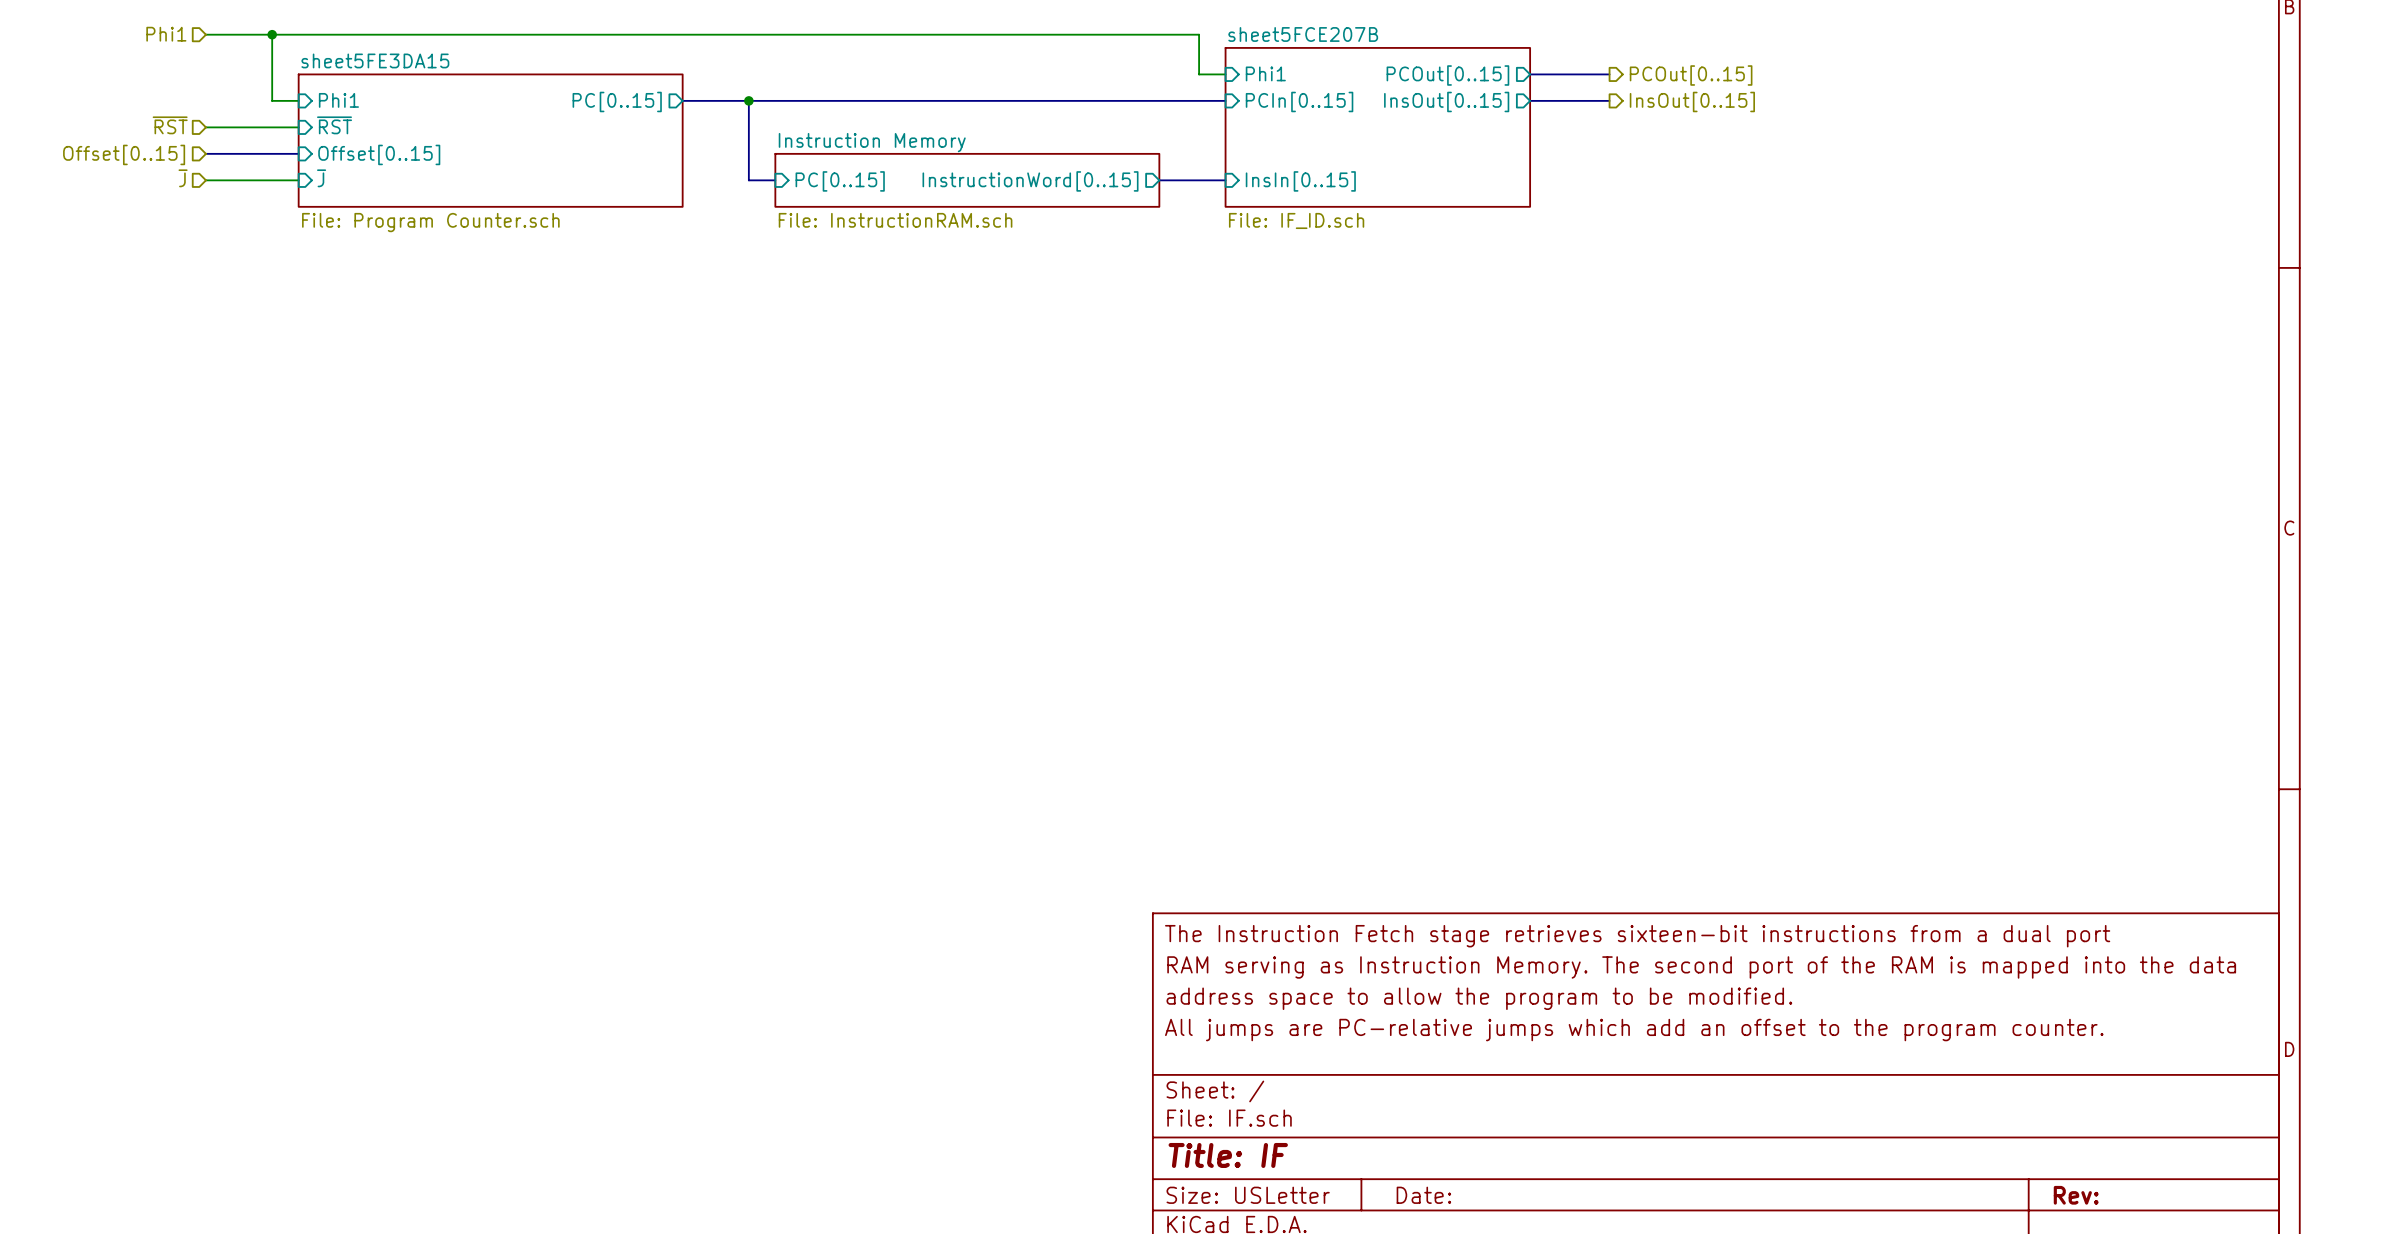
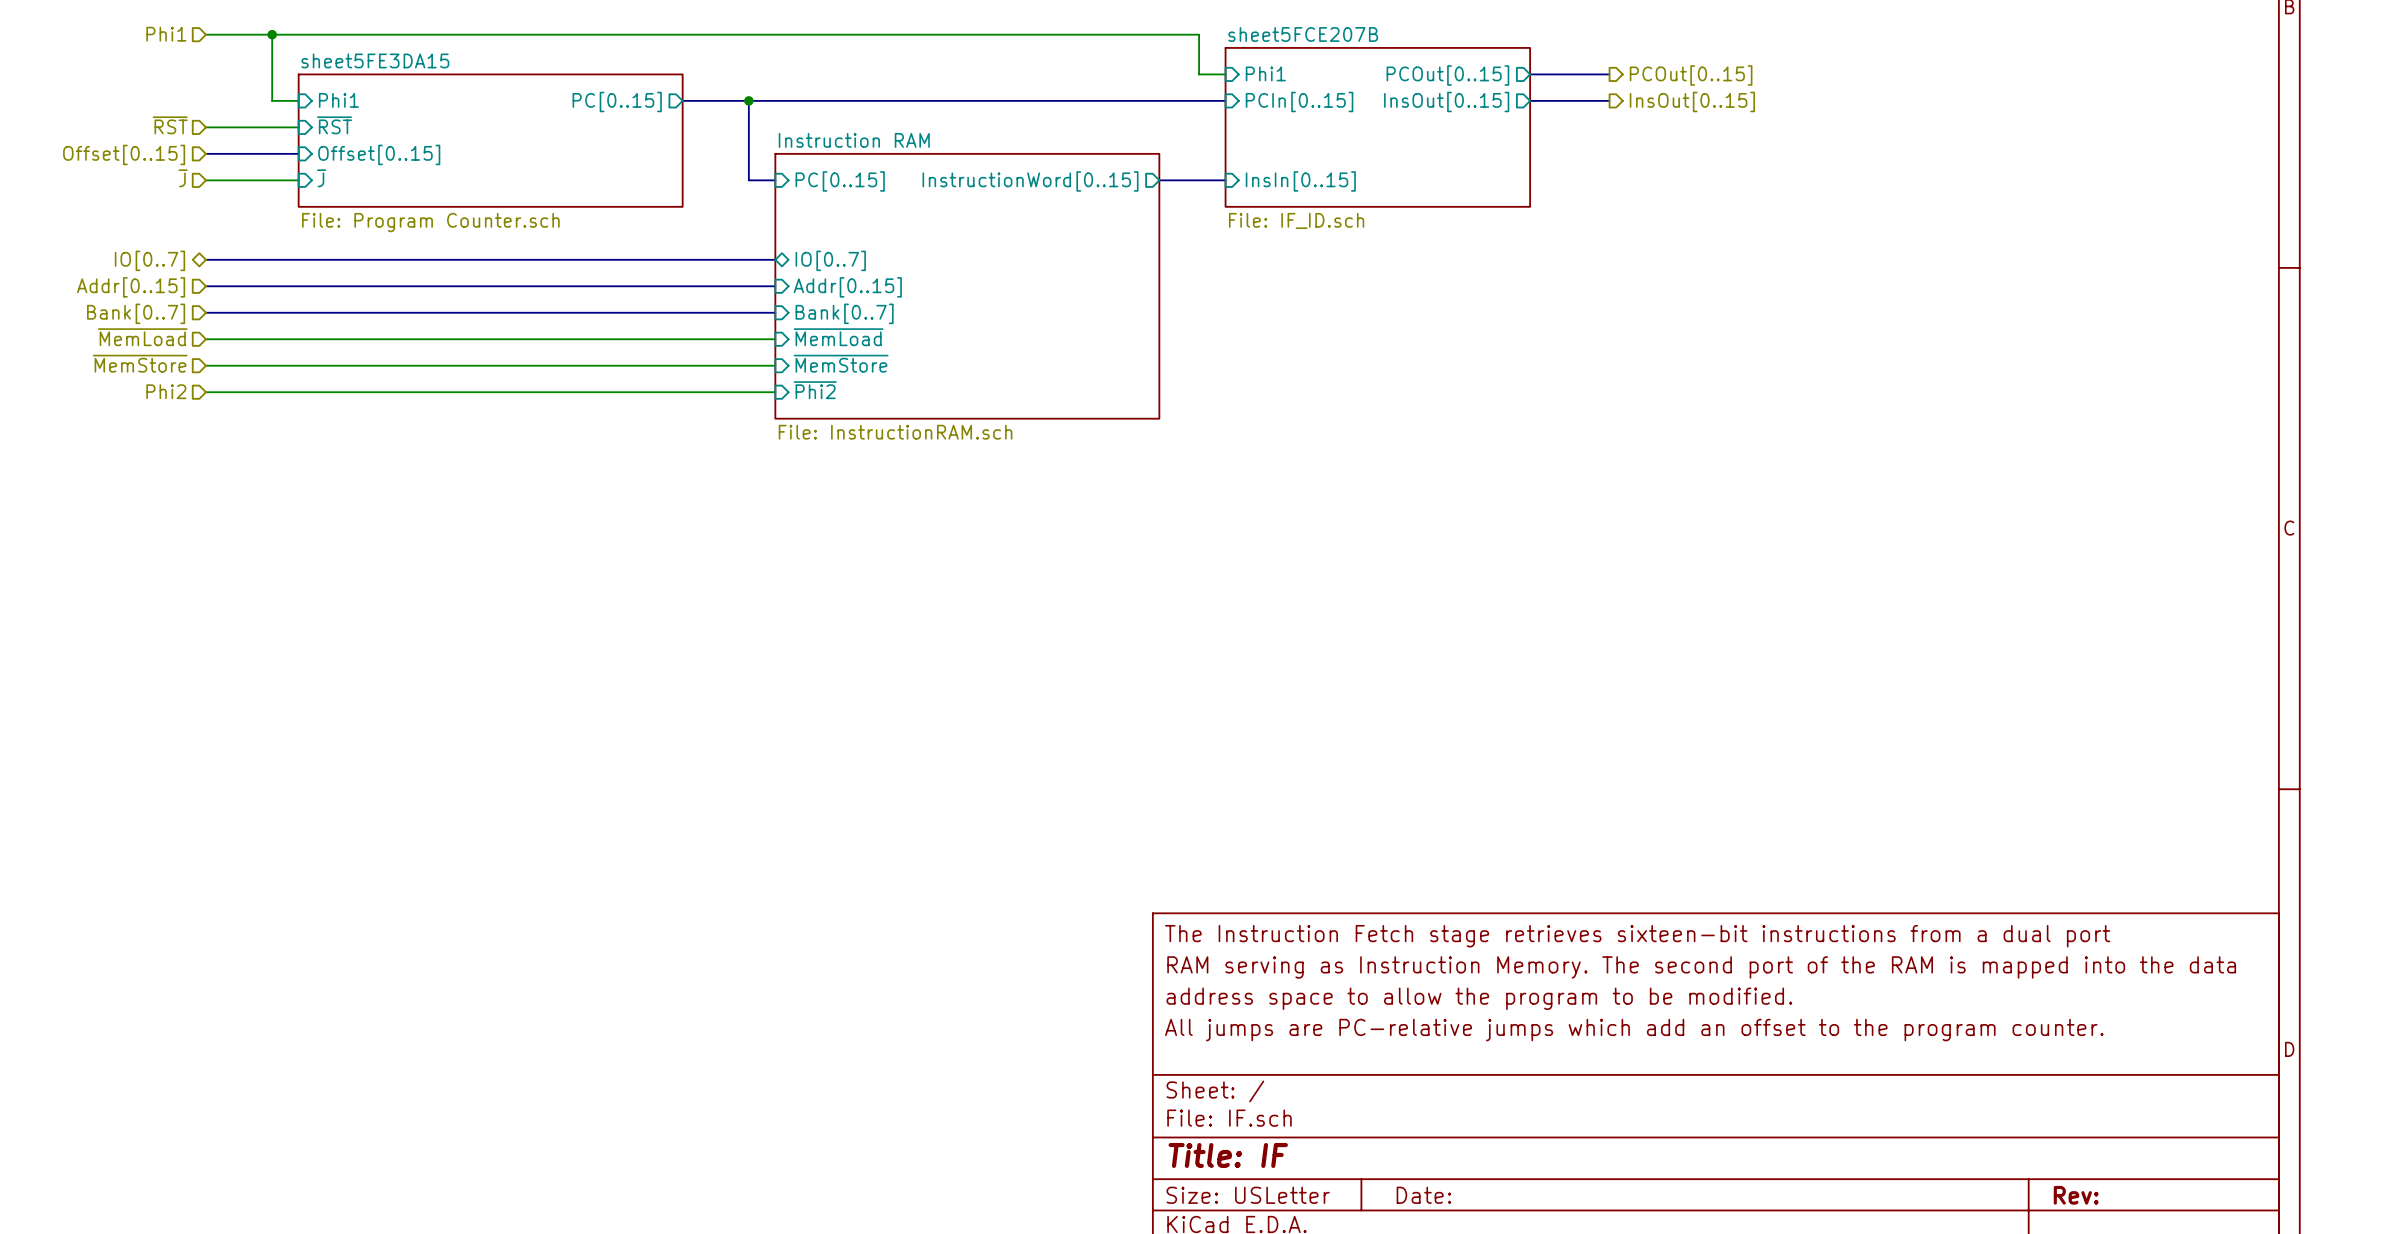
sheet Instruction Memory: File: InstructionRAM.sch (967, 180) -> none
bus: none -> (205, 259) (775, 259)
hierarchical label: none -> IO[0..7] (149, 260)
sheet pin: none -> IO[0..7] (830, 260)
bus: none -> (205, 286) (775, 286)
sheet Instruction RAM: none -> File: InstructionRAM.sch (967, 286)
hierarchical label: none -> Addr[0..15] (131, 287)
sheet pin: none -> Addr[0..15] (847, 287)
bus: none -> (205, 312) (775, 312)
hierarchical label: none -> Bank[0..7] (136, 313)
sheet pin: none -> Bank[0..7] (844, 313)
hierarchical label: none -> ~{MemLoad} (142, 337)
sheet pin: none -> ~{MemLoad} (838, 337)
wire: none -> (205, 339) (775, 339)
hierarchical label: none -> ~{MemStore} (140, 363)
sheet pin: none -> ~{MemStore} (841, 363)
wire: none -> (205, 365) (775, 365)
sheet pin: none -> ~{Phi2} (815, 390)
hierarchical label: none -> Phi2 (166, 391)
wire: none -> (205, 392) (775, 392)

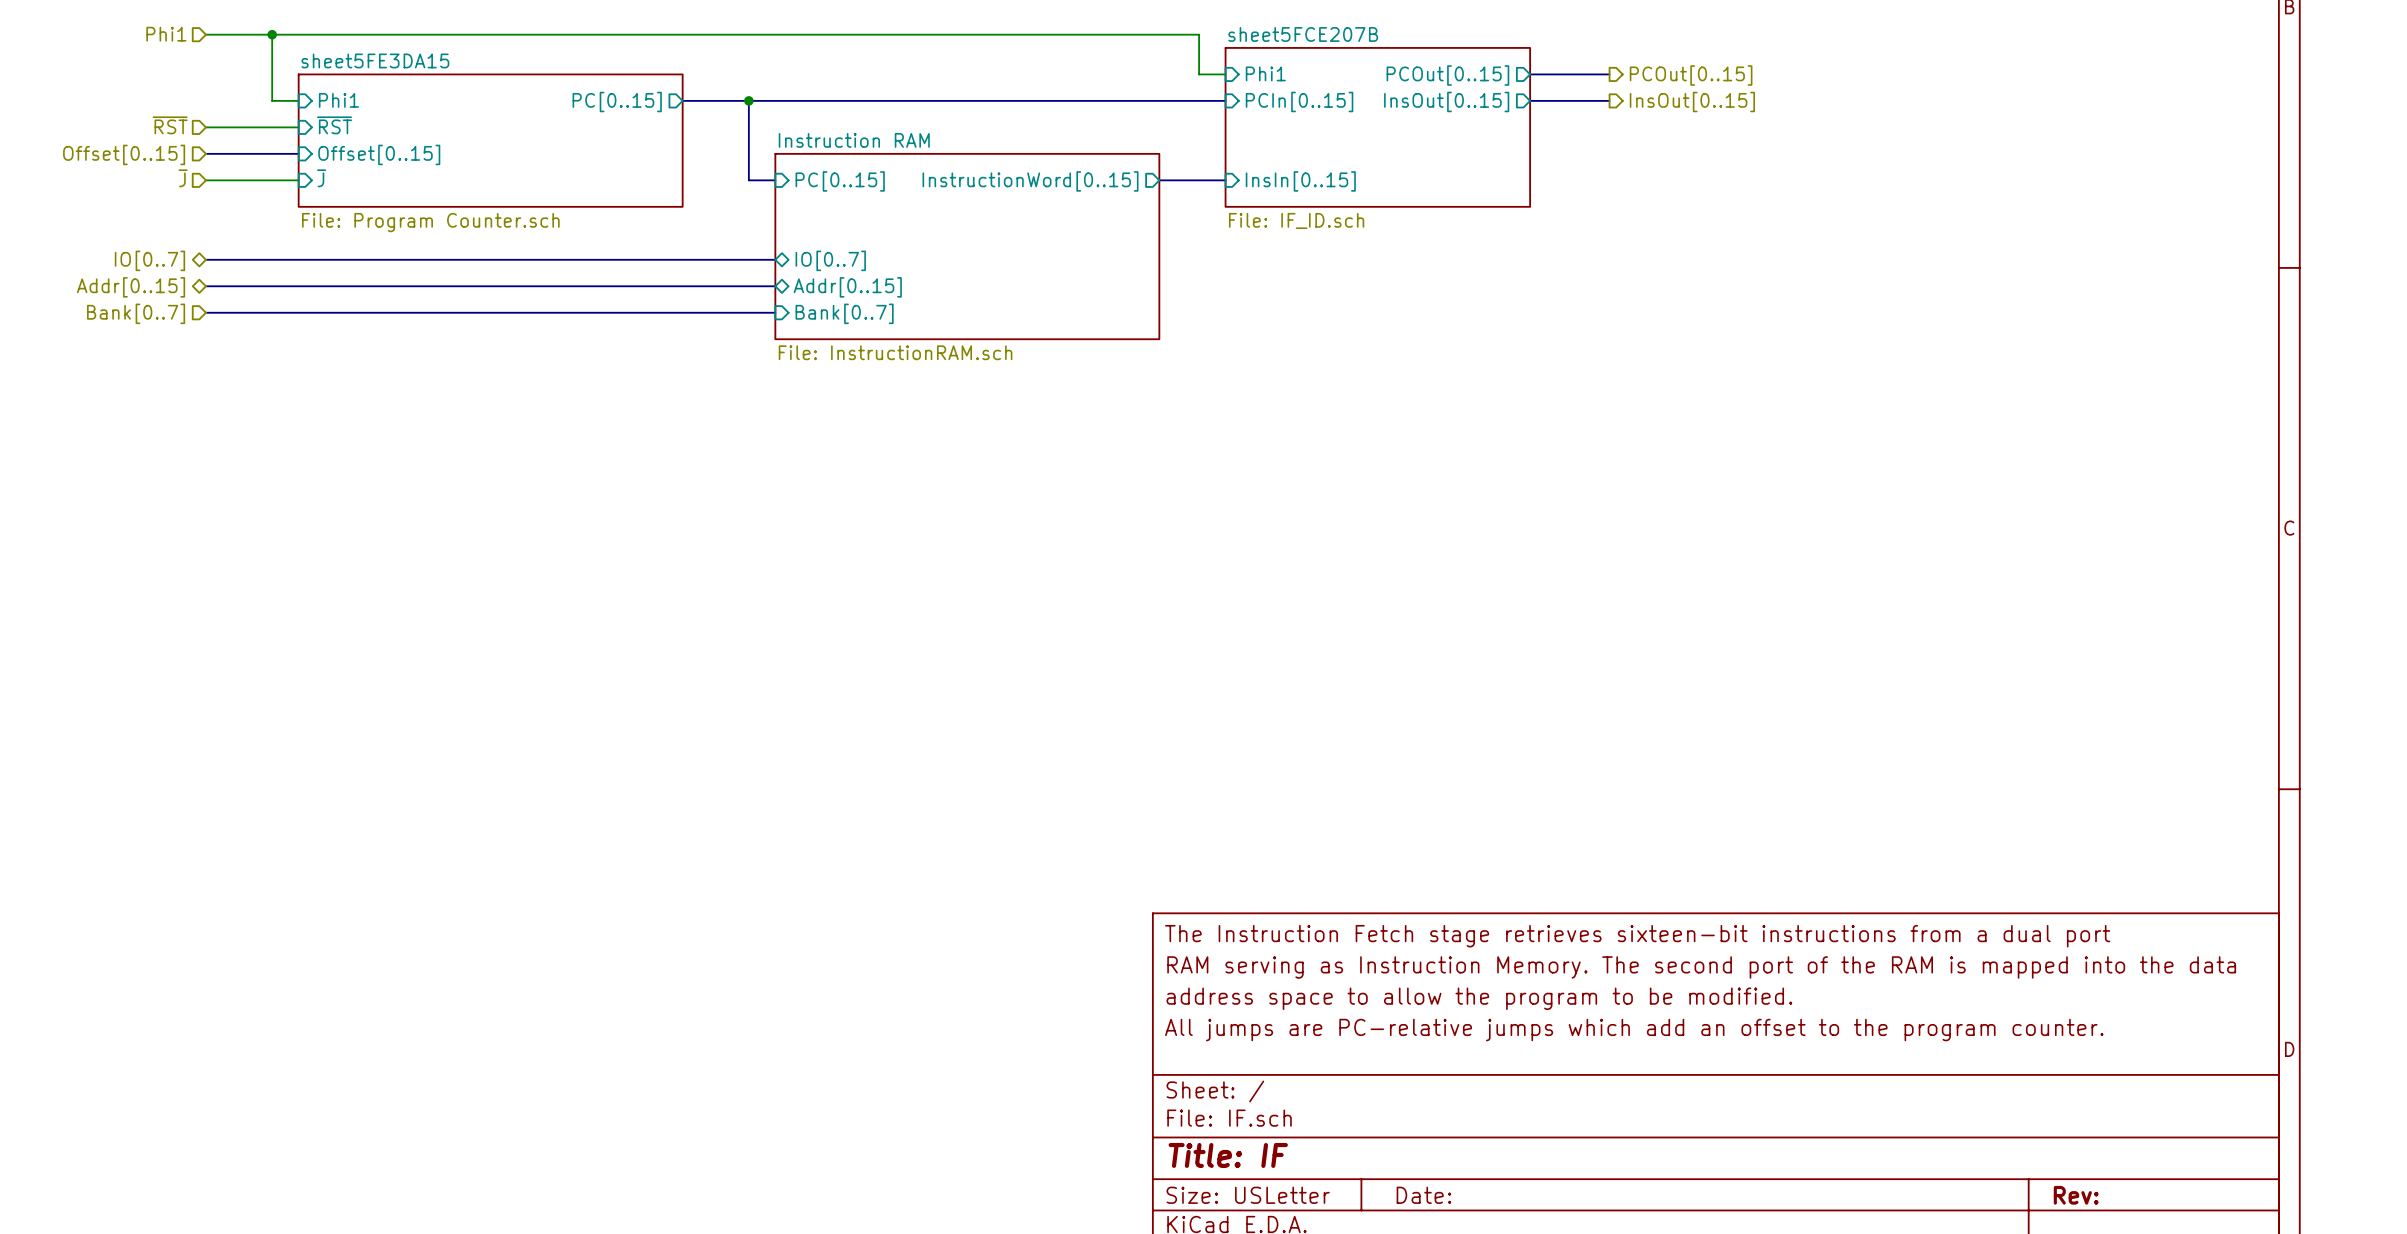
sheet Instruction RAM: none -> File: InstructionRAM.sch (967, 246)
sheet Instruction RAM: File: InstructionRAM.sch (967, 286) -> none
hierarchical label shape: input (131, 287) -> bidirectional (131, 287)
sheet pin shape: input (847, 287) -> bidirectional (847, 287)
hierarchical label: ~{MemLoad} (142, 337) -> none
sheet pin: ~{MemLoad} (838, 337) -> none
wire: (205, 339) (775, 339) -> none
hierarchical label: ~{MemStore} (140, 363) -> none
sheet pin: ~{MemStore} (841, 363) -> none
wire: (205, 365) (775, 365) -> none
sheet pin: ~{Phi2} (815, 390) -> none
hierarchical label: Phi2 (166, 391) -> none
wire: (205, 392) (775, 392) -> none

